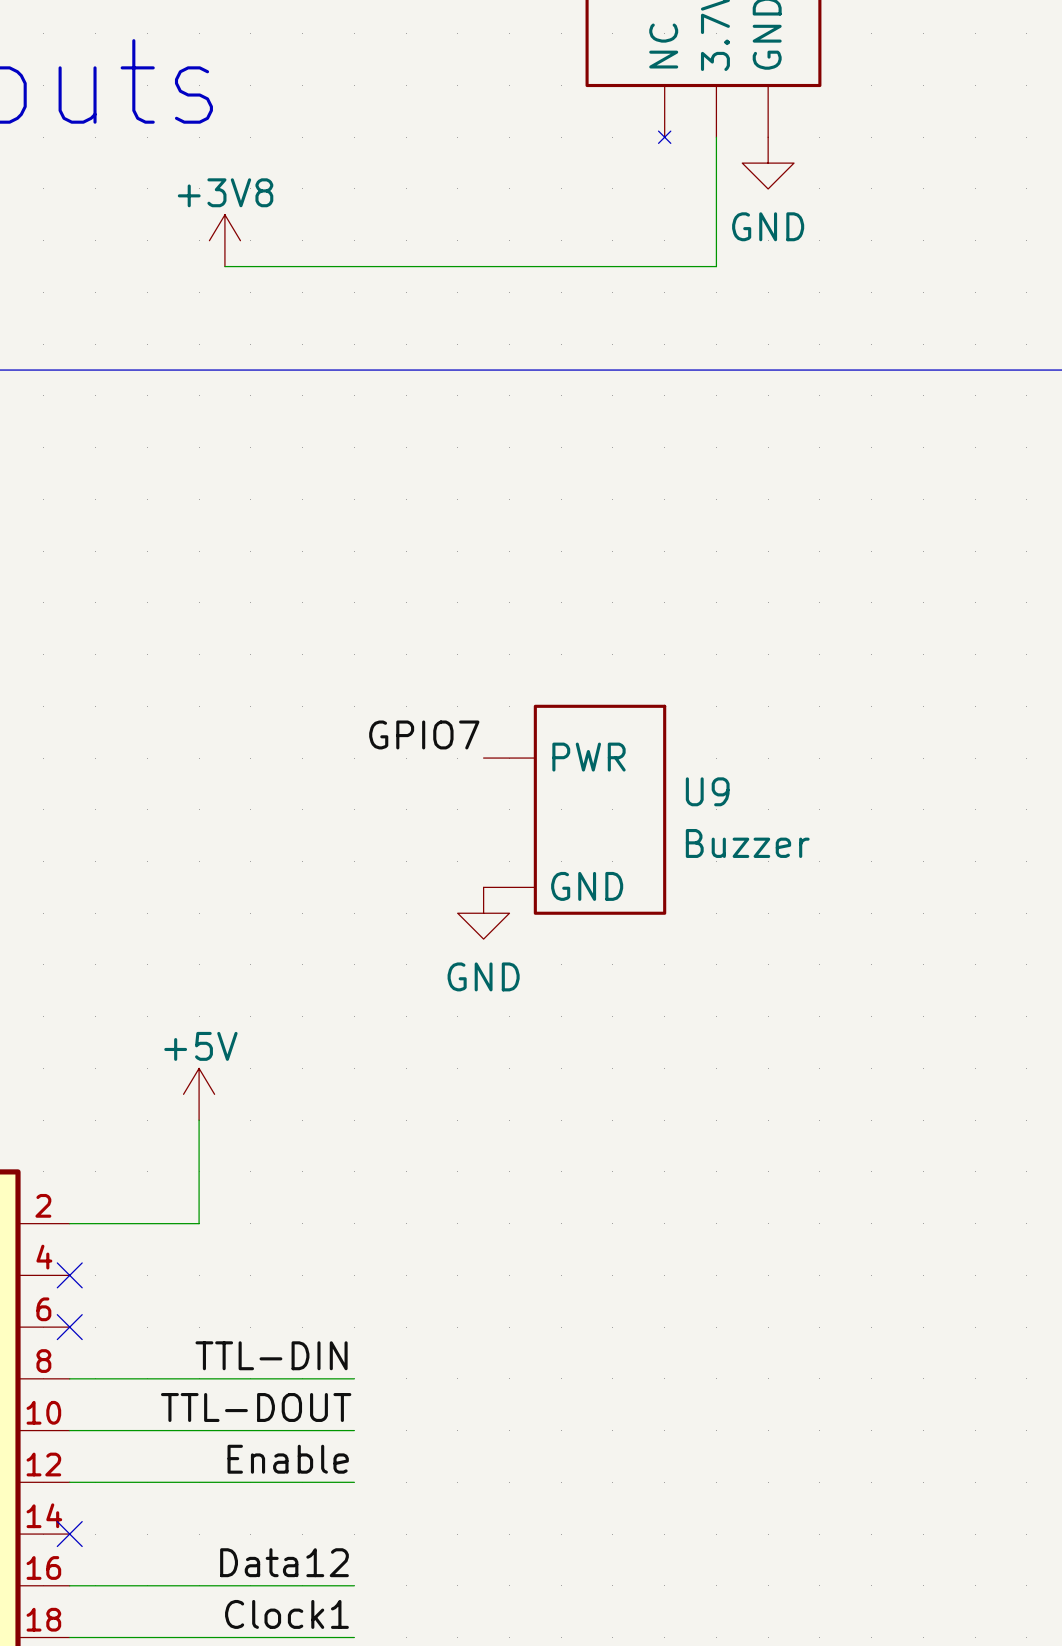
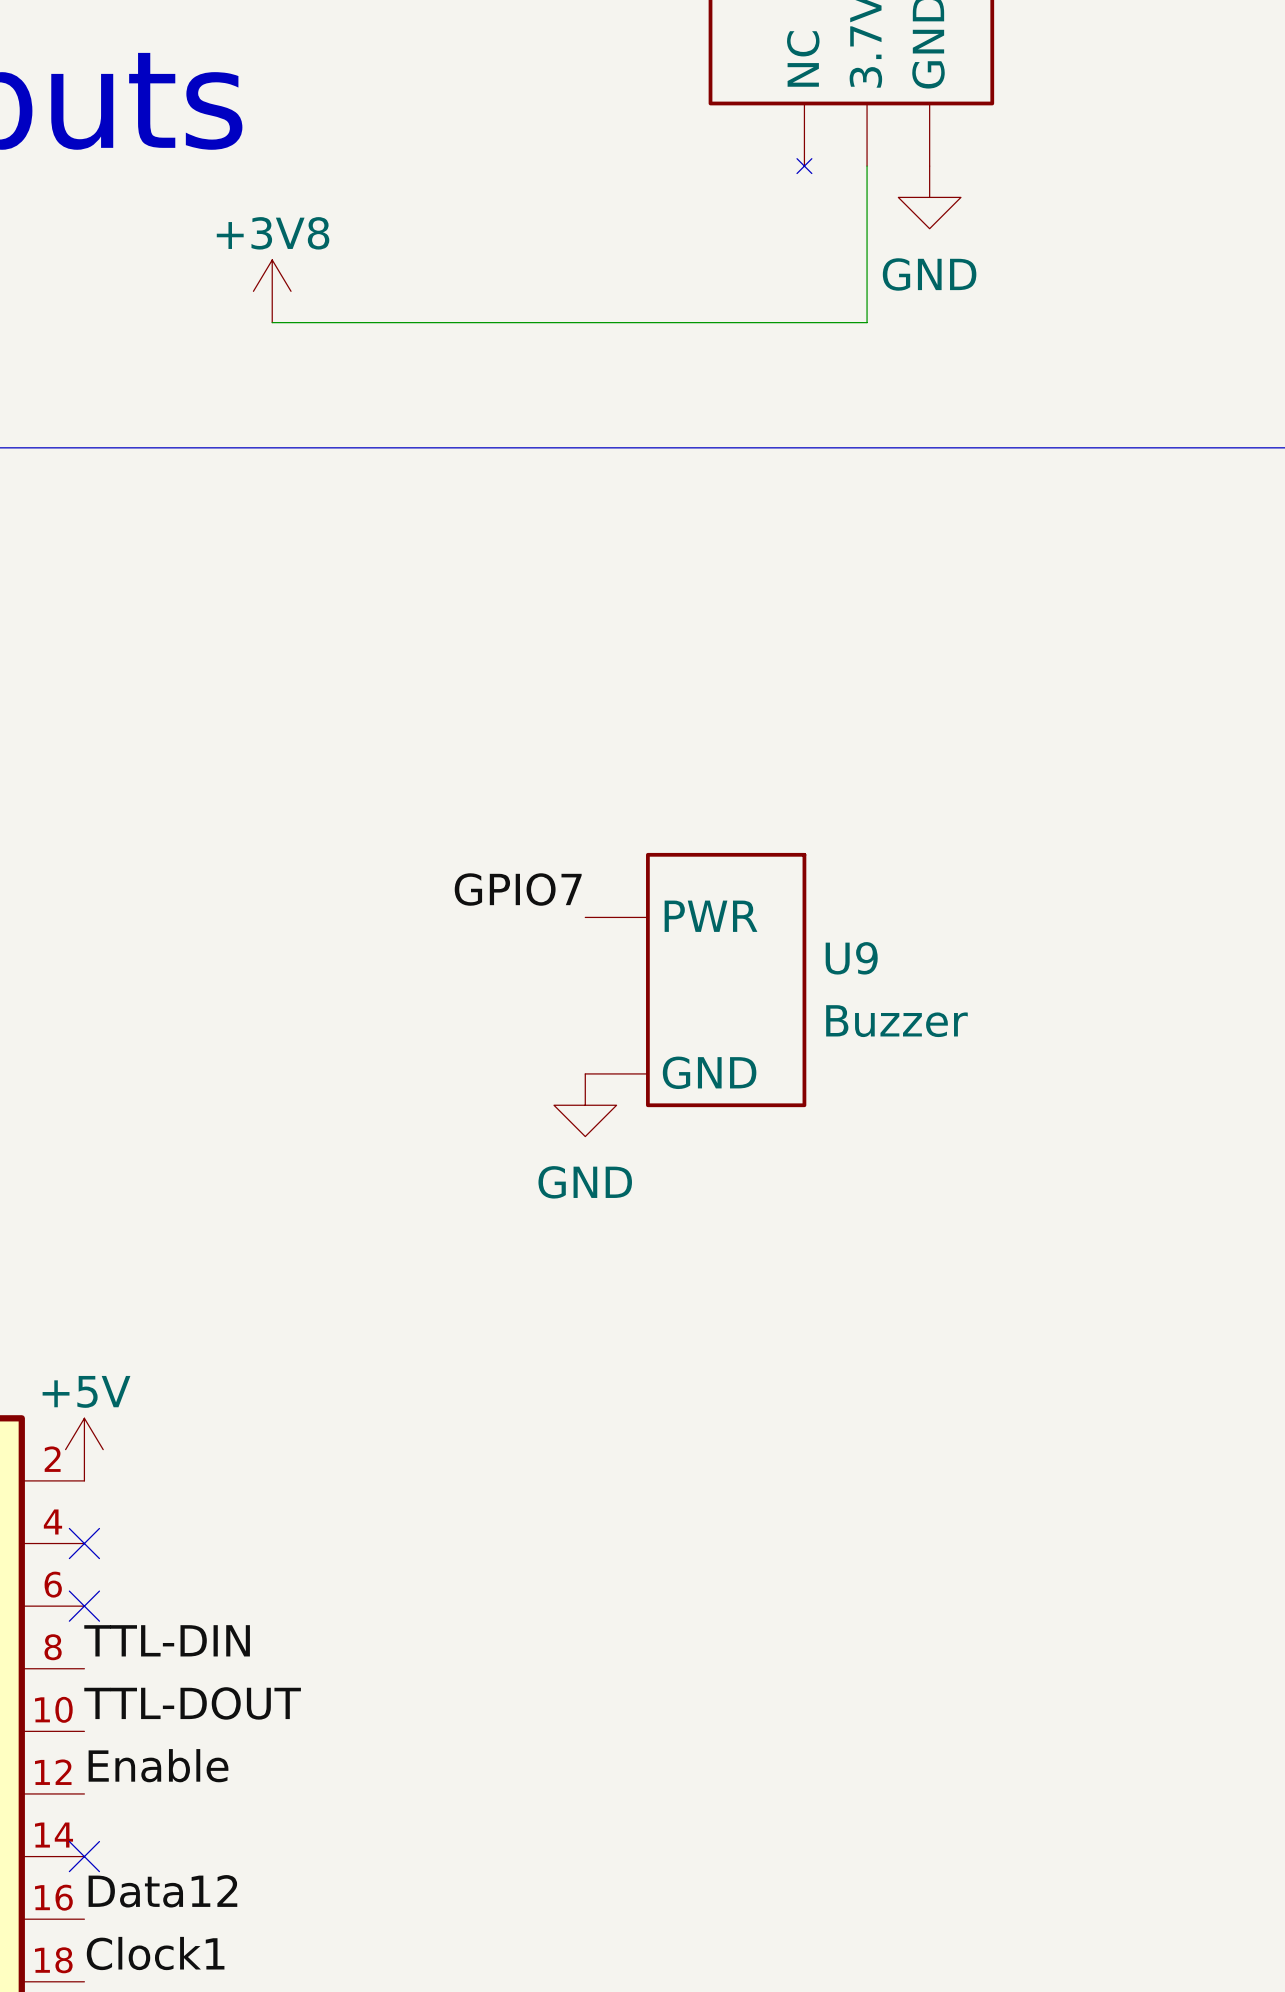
power symbol position: +5V (199, 1094) -> +5V (84, 1449)
wire: (199, 1120) (199, 1223) (69, 1223) -> none
label position: TTL-DIN (271, 1355) -> TTL-DIN (167, 1640)
wire: (69, 1378) (354, 1378) -> none
label position: TTL-DOUT (256, 1407) -> TTL-DOUT (192, 1703)
wire: (69, 1430) (354, 1430) -> none
label position: Enable (288, 1459) -> Enable (158, 1765)
wire: (69, 1482) (354, 1482) -> none
label position: Data12 (284, 1562) -> Data12 (162, 1891)
wire: (69, 1585) (354, 1585) -> none
label position: Clock1 (286, 1614) -> Clock1 (155, 1953)
wire: (69, 1637) (354, 1637) -> none

